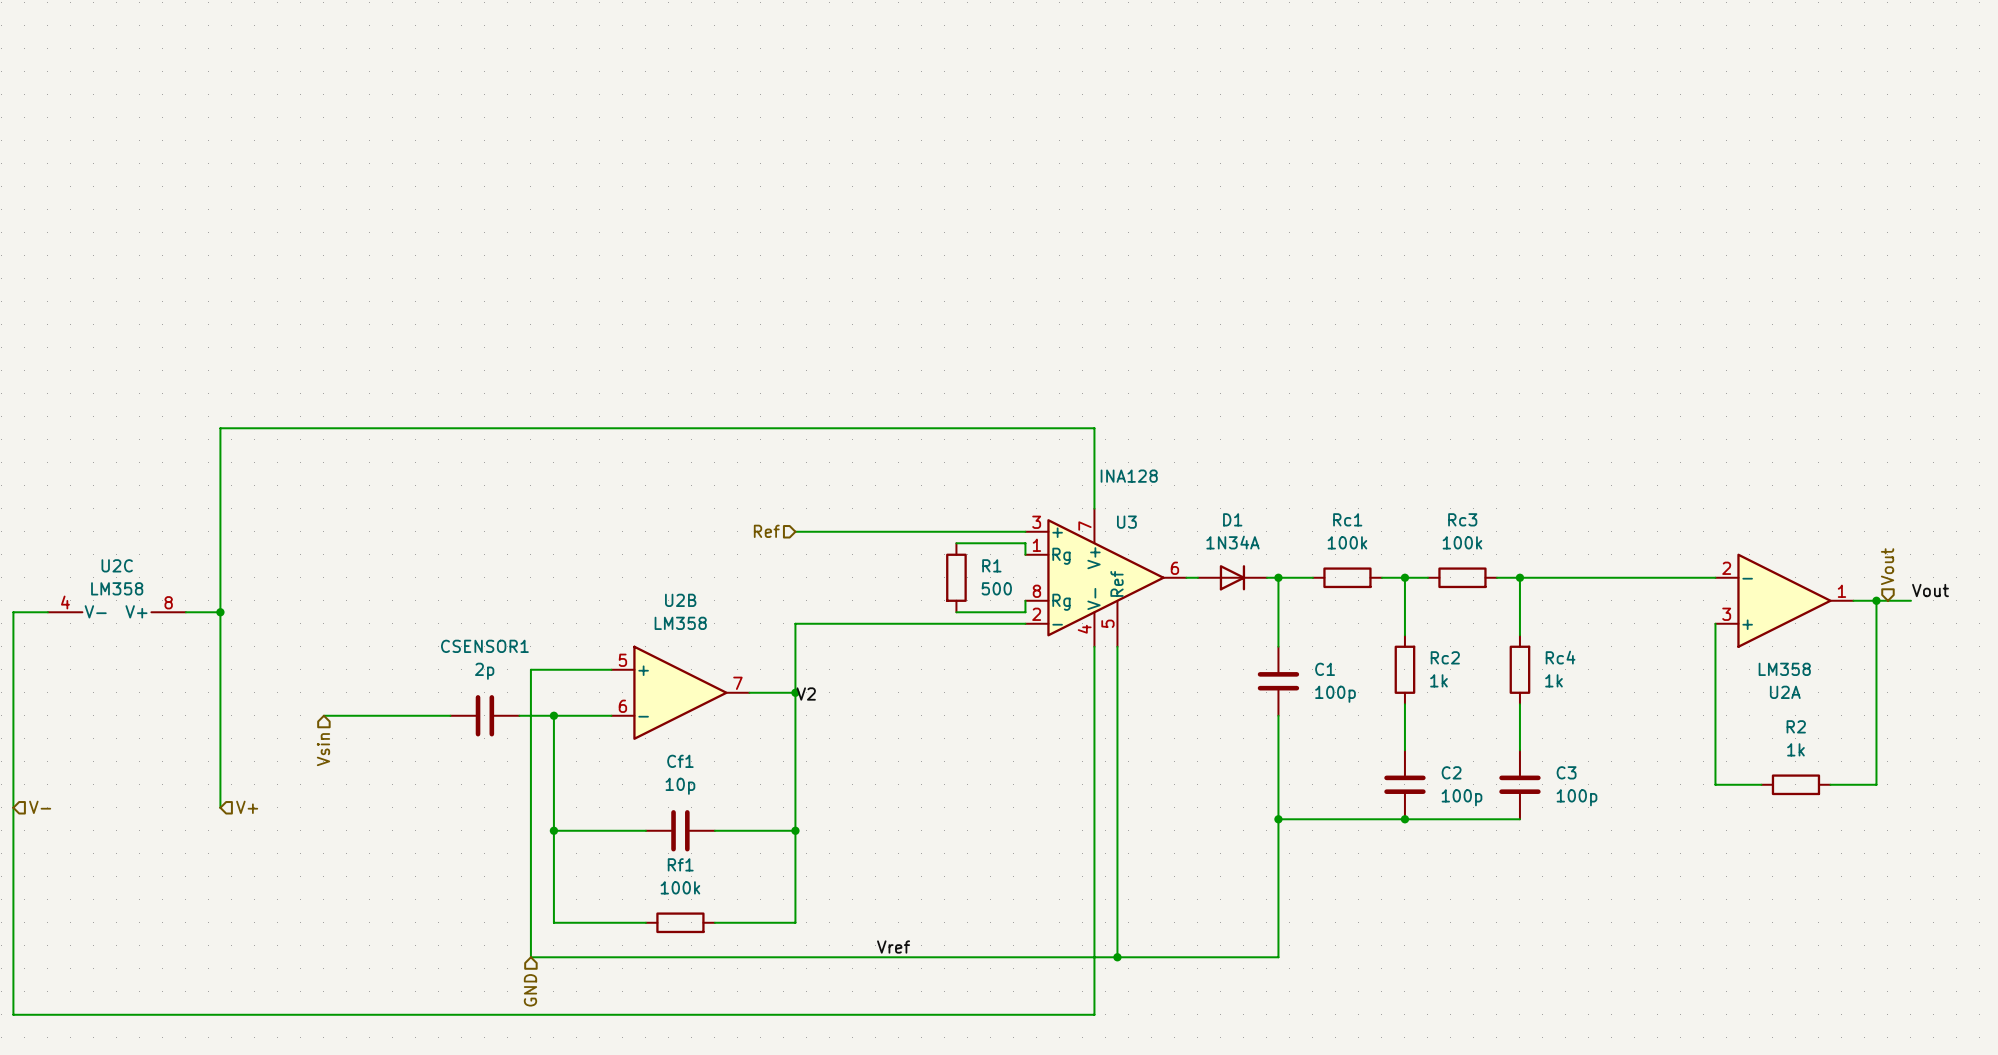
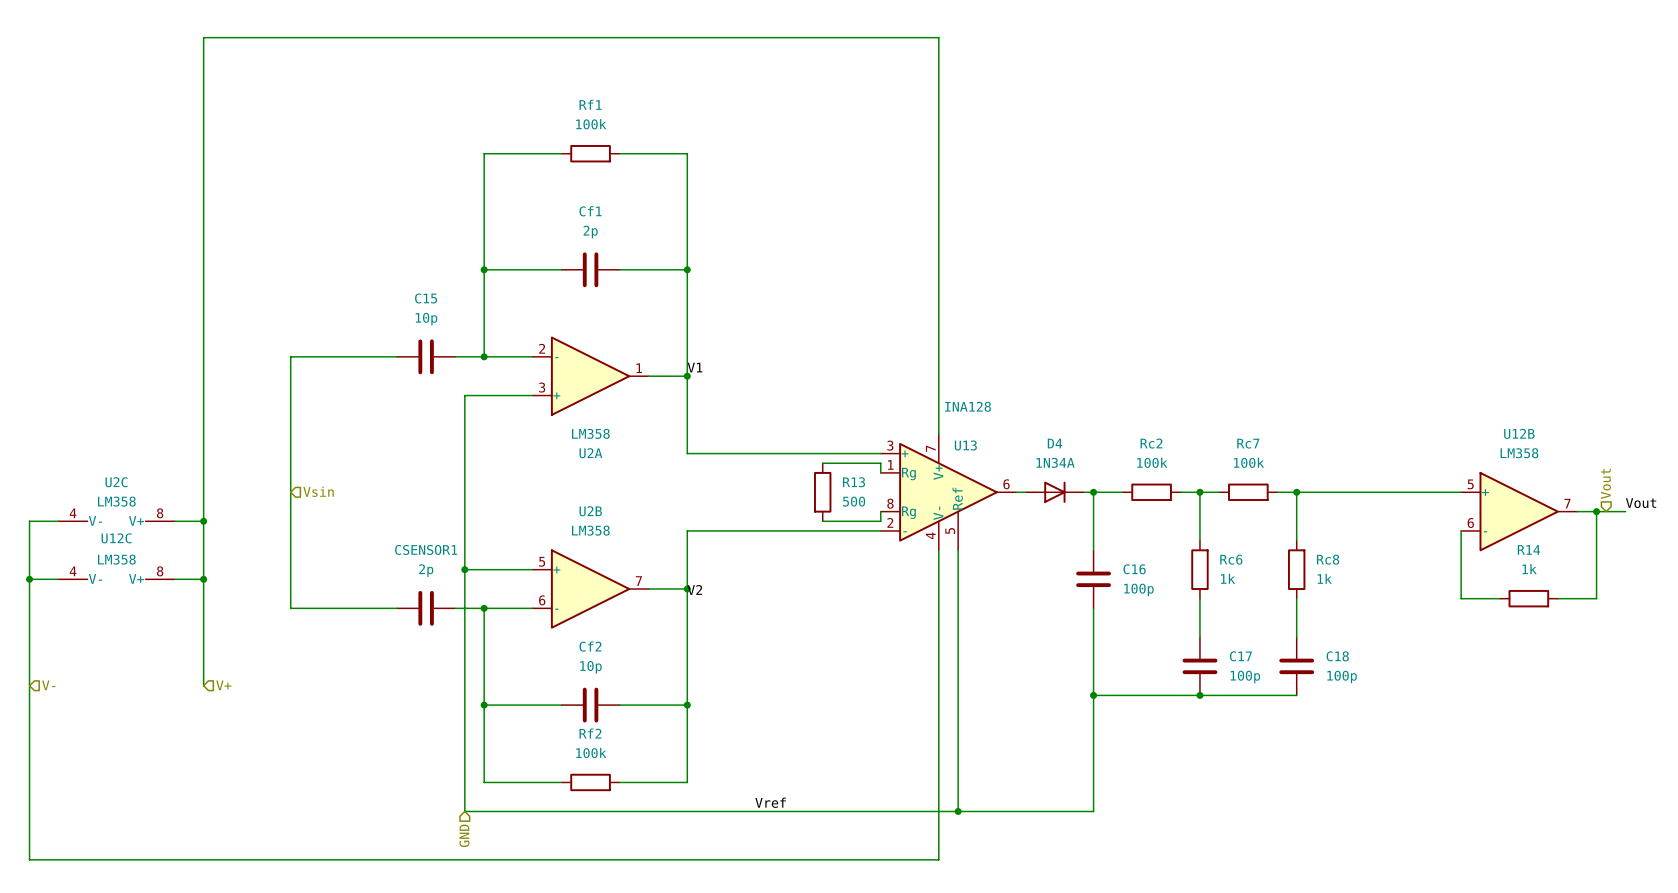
wire: none -> (561, 153) (484, 153) (484, 356)
Rf1: none -> 100k (590, 153)
wire: none -> (619, 153) (687, 153) (687, 453)
wire: none -> (484, 269) (561, 269)
junction: none -> (484, 269)
Cf1: none -> 2p (590, 269)
wire: none -> (619, 269) (687, 269)
junction: none -> (687, 269)
wire: none -> (397, 356) (290, 356) (290, 608)
C15: none -> 10p (426, 356)
wire: none -> (455, 356) (532, 356)
junction: none -> (484, 356)
wire: (220, 428) (1094, 428) -> (203, 366) (203, 37) (938, 37) (938, 366)
label: none -> V1 (695, 367)
wire: none -> (648, 376) (687, 376)
junction: none -> (687, 376)
wire: none -> (532, 395) (464, 395) (464, 569)
D1 name: D1 (1232, 519) -> D4 (1055, 443)
Rc1 name: Rc1 (1347, 519) -> Rc2 (1151, 443)
Rc3 name: Rc3 (1462, 519) -> Rc7 (1248, 443)
U3 name: U3 (1126, 522) -> U13 (965, 445)
hierarchical label: Ref (766, 531) -> none
R1 name: R1 (991, 565) -> R13 (854, 482)
U2A position: (1784, 600) -> (590, 376)
U12B: none -> LM358 (1519, 511)
Rc2 name: Rc2 (1445, 657) -> Rc6 (1231, 559)
Rc4 name: Rc4 (1560, 657) -> Rc8 (1328, 559)
junction: none -> (464, 569)
C1 name: C1 (1325, 669) -> C16 (1134, 569)
wire: none -> (29, 579) (58, 579)
junction: none -> (29, 579)
U12C: none -> LM358 (116, 579)
wire: none -> (174, 579) (203, 579)
junction: none -> (203, 579)
wire: (1715, 704) (1715, 784) (1761, 784) -> (1461, 598) (1499, 598)
R14: none -> 1k (1528, 598)
wire: (1876, 704) (1876, 784) (1830, 784) -> (1596, 598) (1557, 598)
hierarchical label rotation: 0° (323, 749) -> 90° counterclockwise (318, 491)
hierarchical label position: Vsin (323, 749) -> Vsin (318, 491)
Cf1 name: Cf1 (680, 761) -> Cf2 (590, 646)
C2 name: C2 (1451, 772) -> C17 (1240, 656)
C3 name: C3 (1566, 772) -> C18 (1337, 656)
R2: 1k (1795, 784) -> none
Rf1 name: Rf1 (680, 864) -> Rf2 (590, 733)

